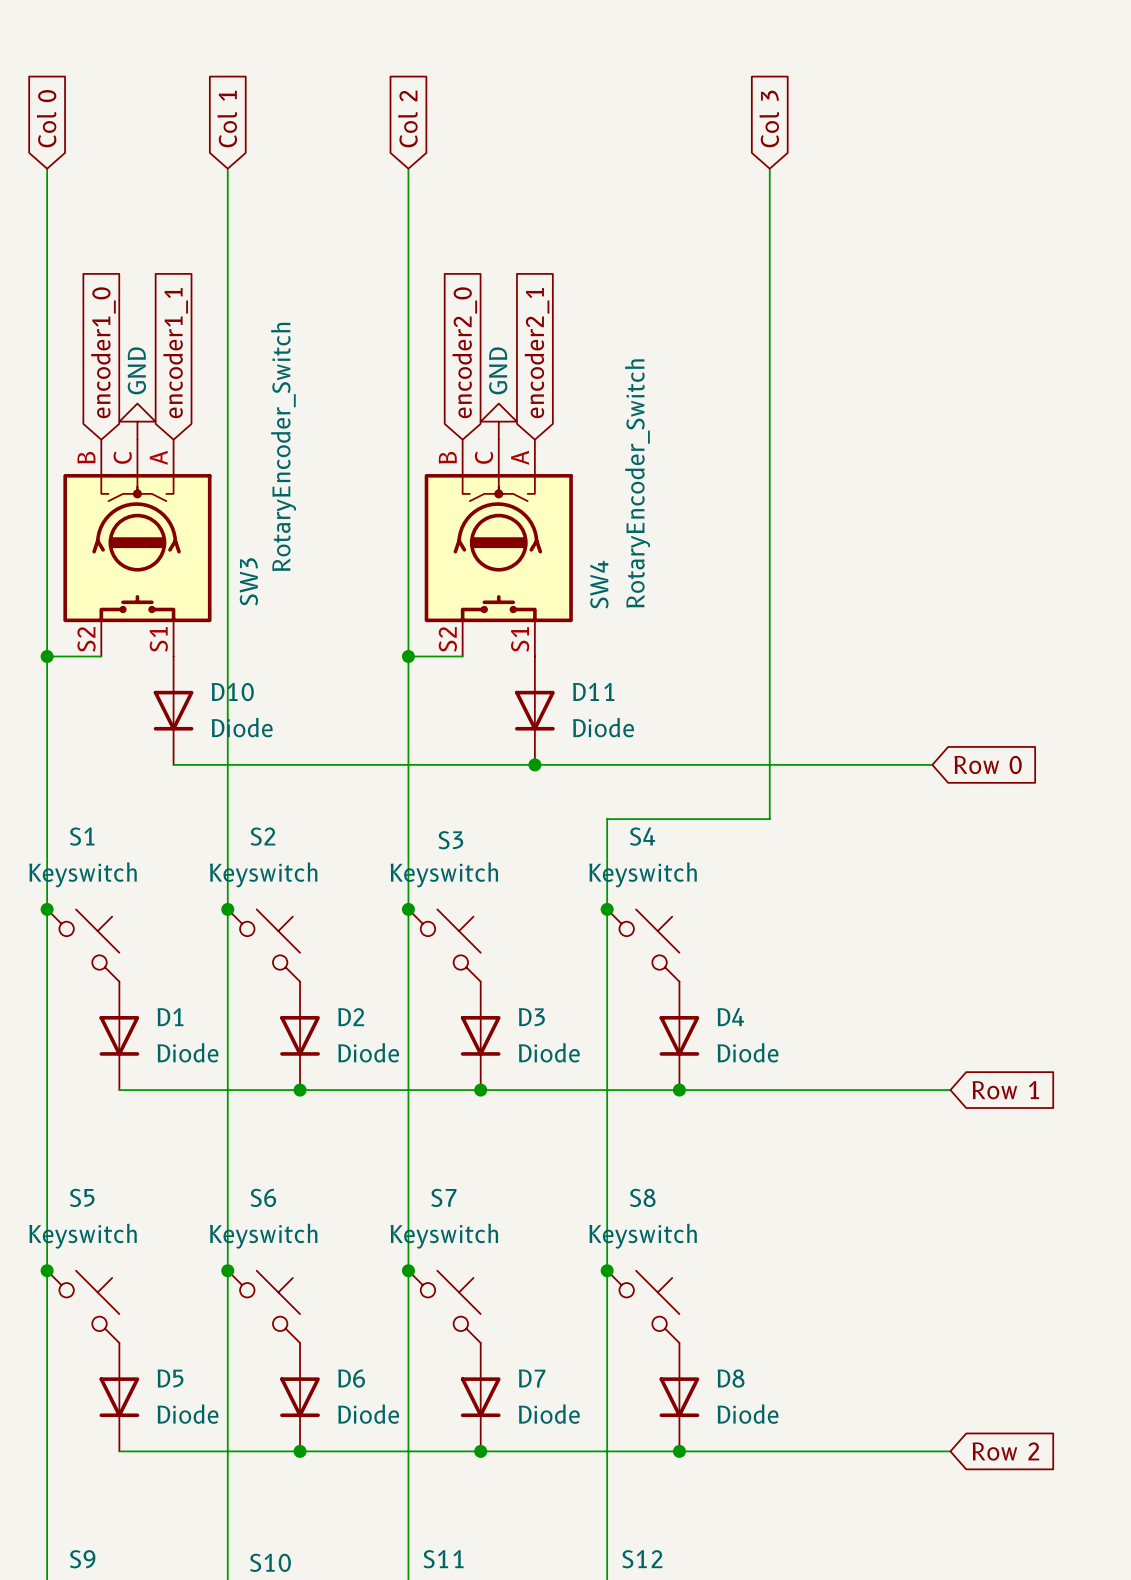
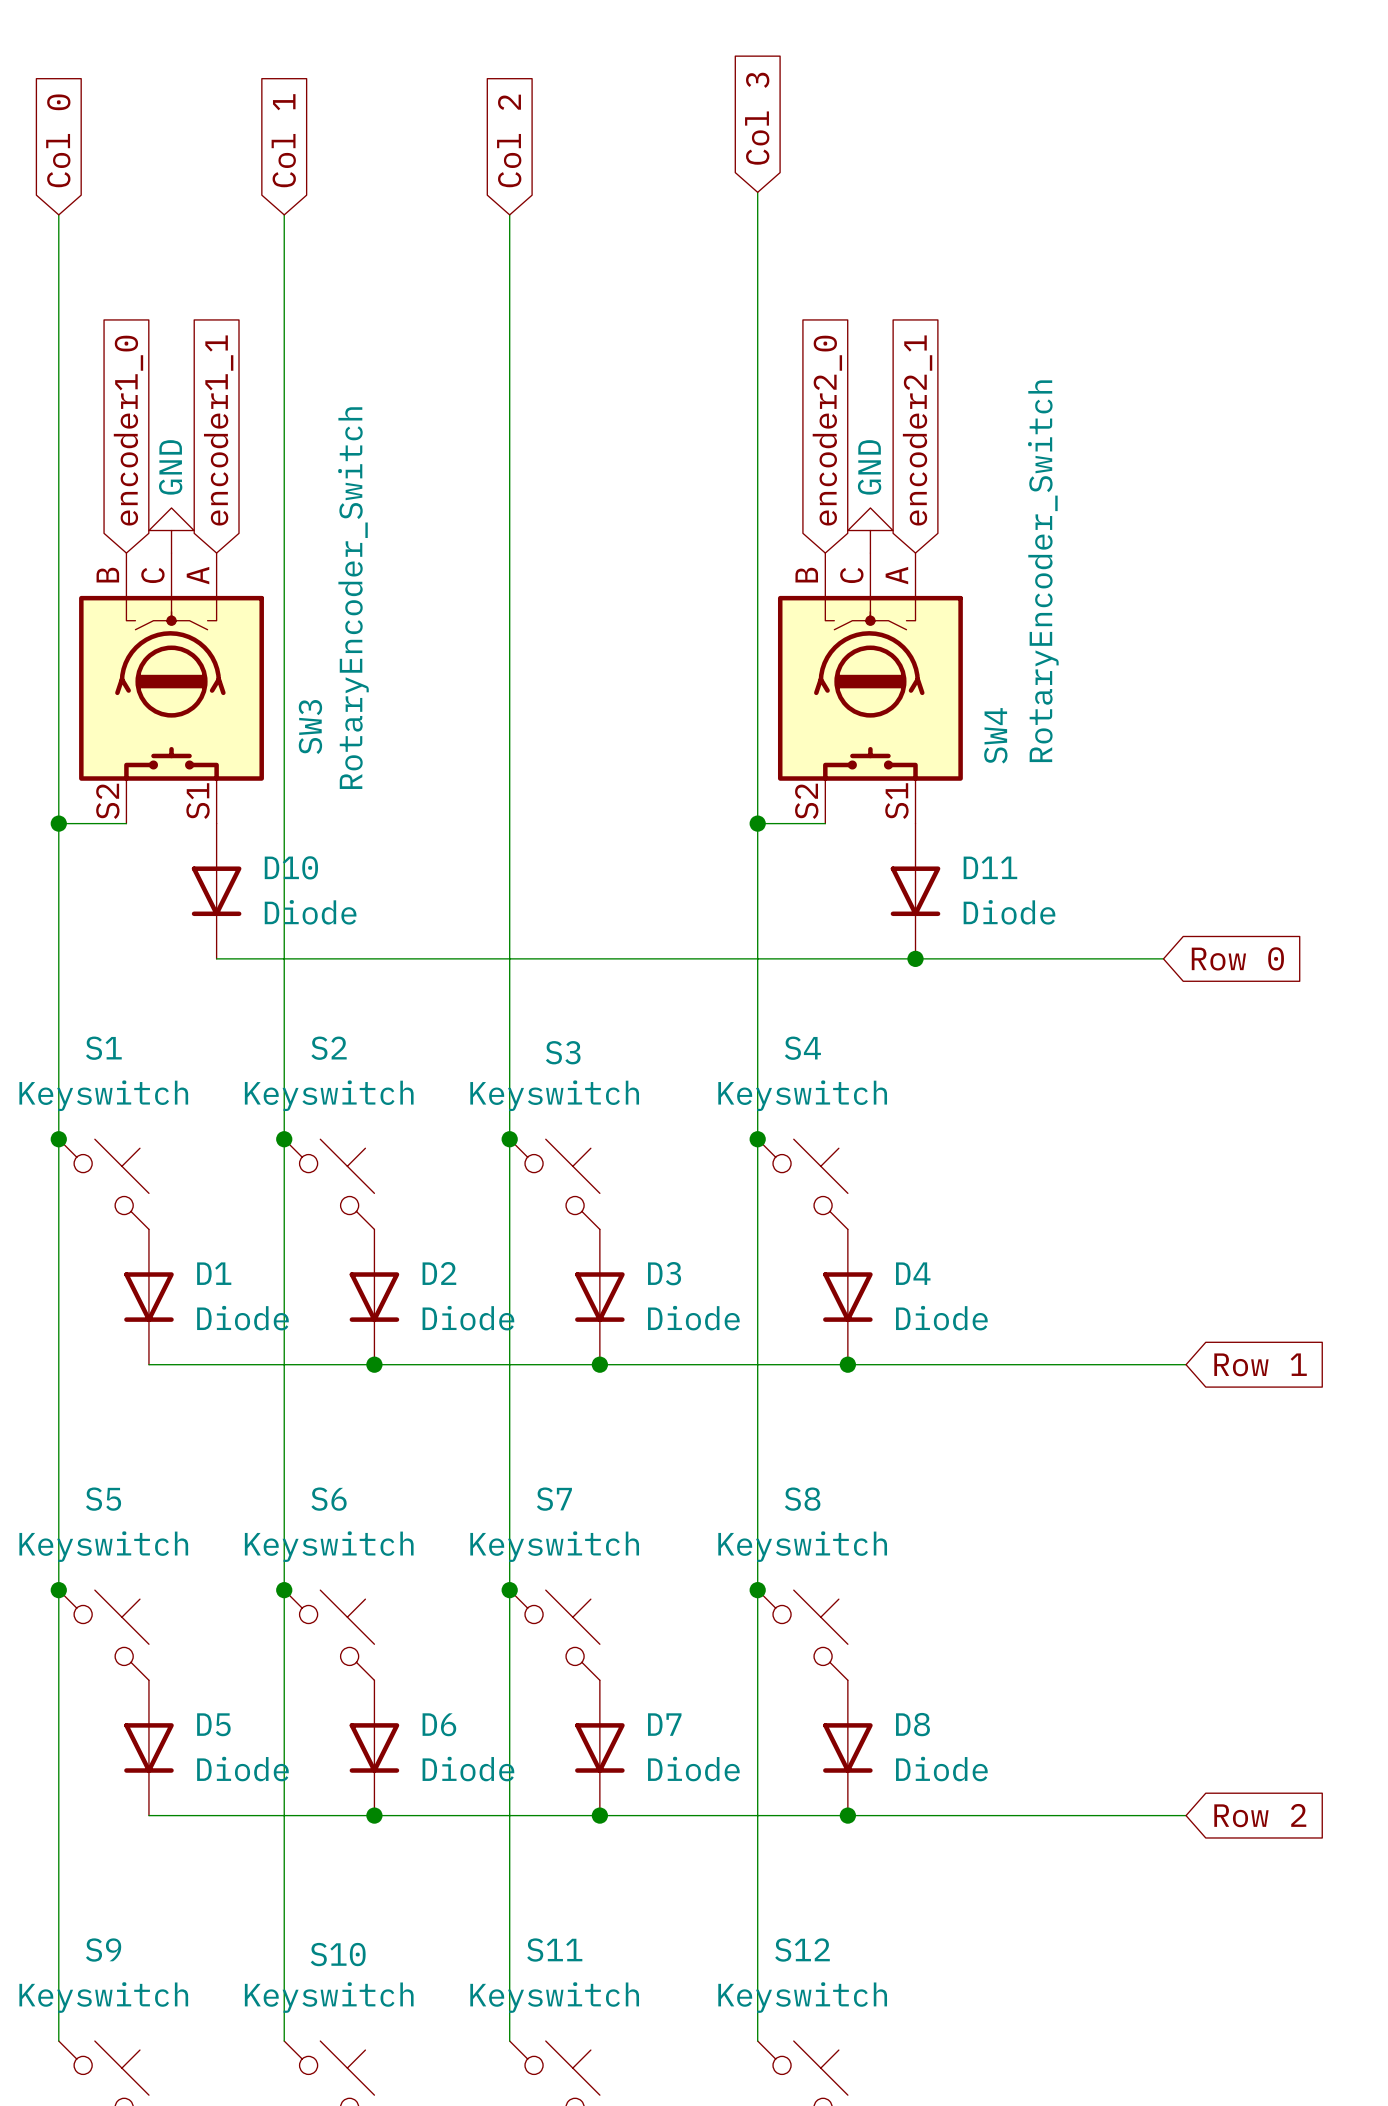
global label position: Col 3 (769, 118) -> Col 3 (757, 118)
wire: (769, 168) (769, 819) (607, 819) -> (757, 192) (757, 1026)
global label position: encoder2_0 (464, 352) -> encoder2_0 (827, 430)
global label position: encoder2_1 (537, 353) -> encoder2_1 (917, 430)
power symbol position: GND (498, 421) -> GND (870, 530)
SW4 position: (498, 548) -> (870, 688)
wire: (408, 656) (462, 656) -> (757, 823) (825, 823)
junction: (408, 656) -> none
junction: none -> (757, 823)
D11 position: (534, 710) -> (915, 891)
junction: (534, 764) -> none
junction: none -> (915, 958)

